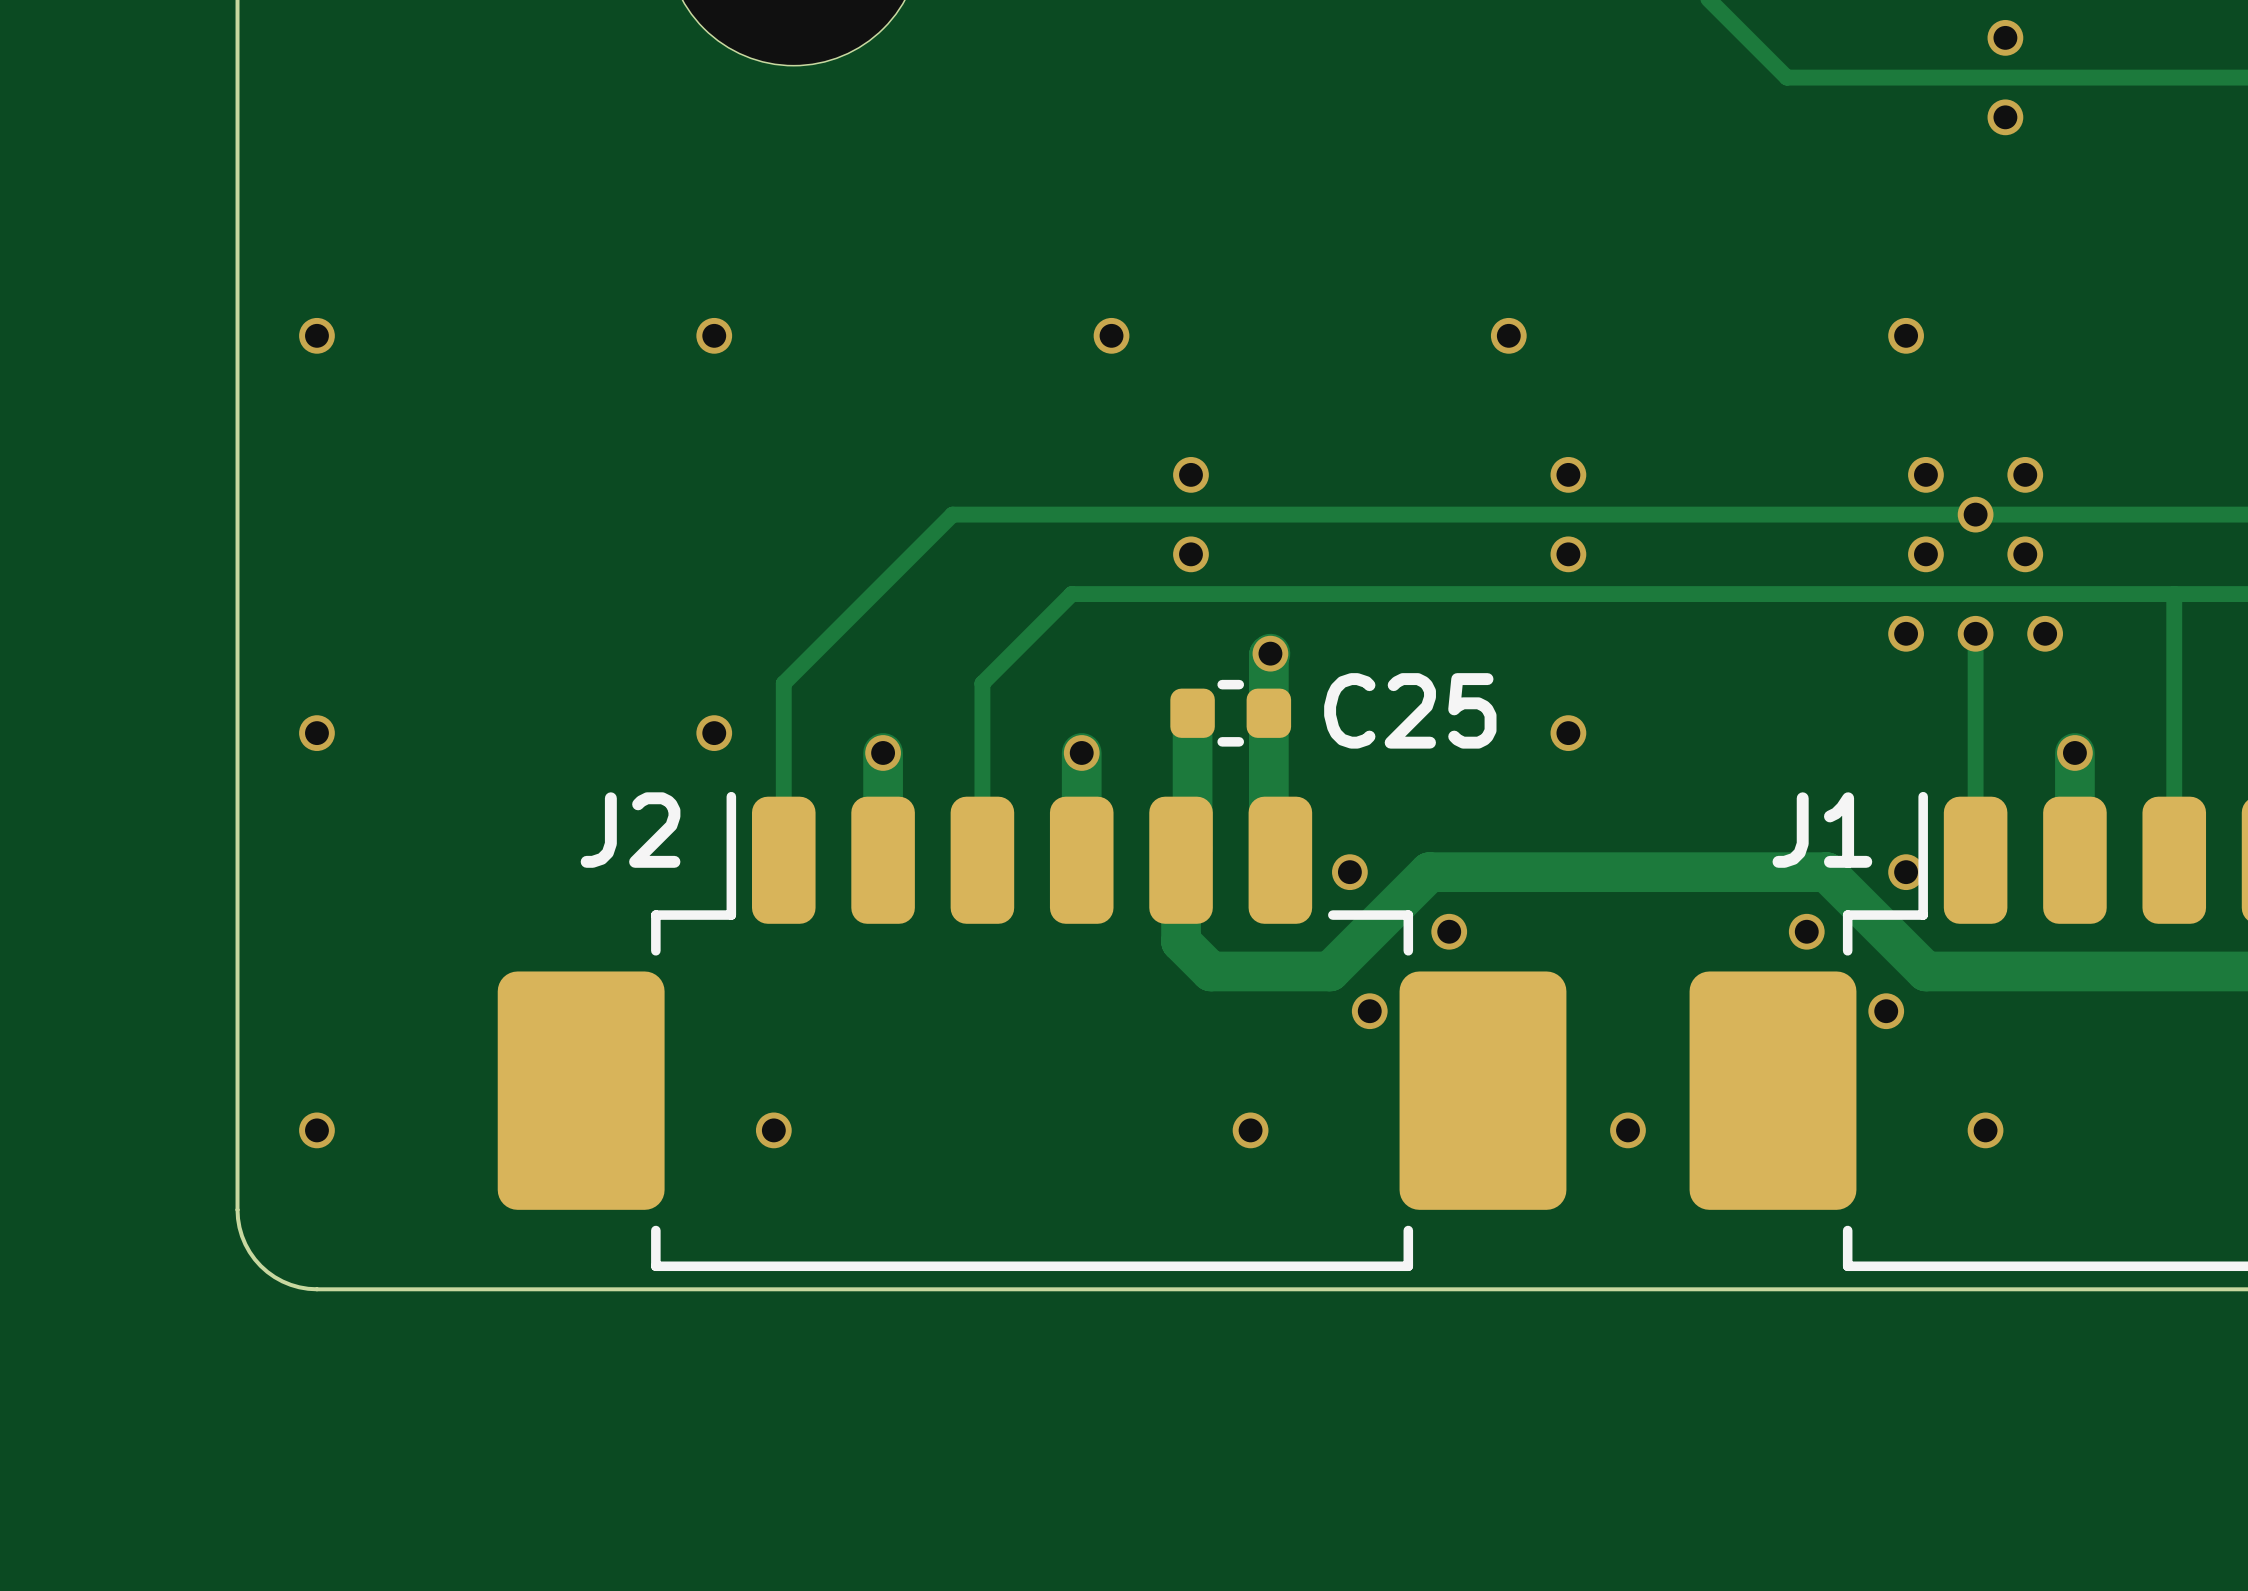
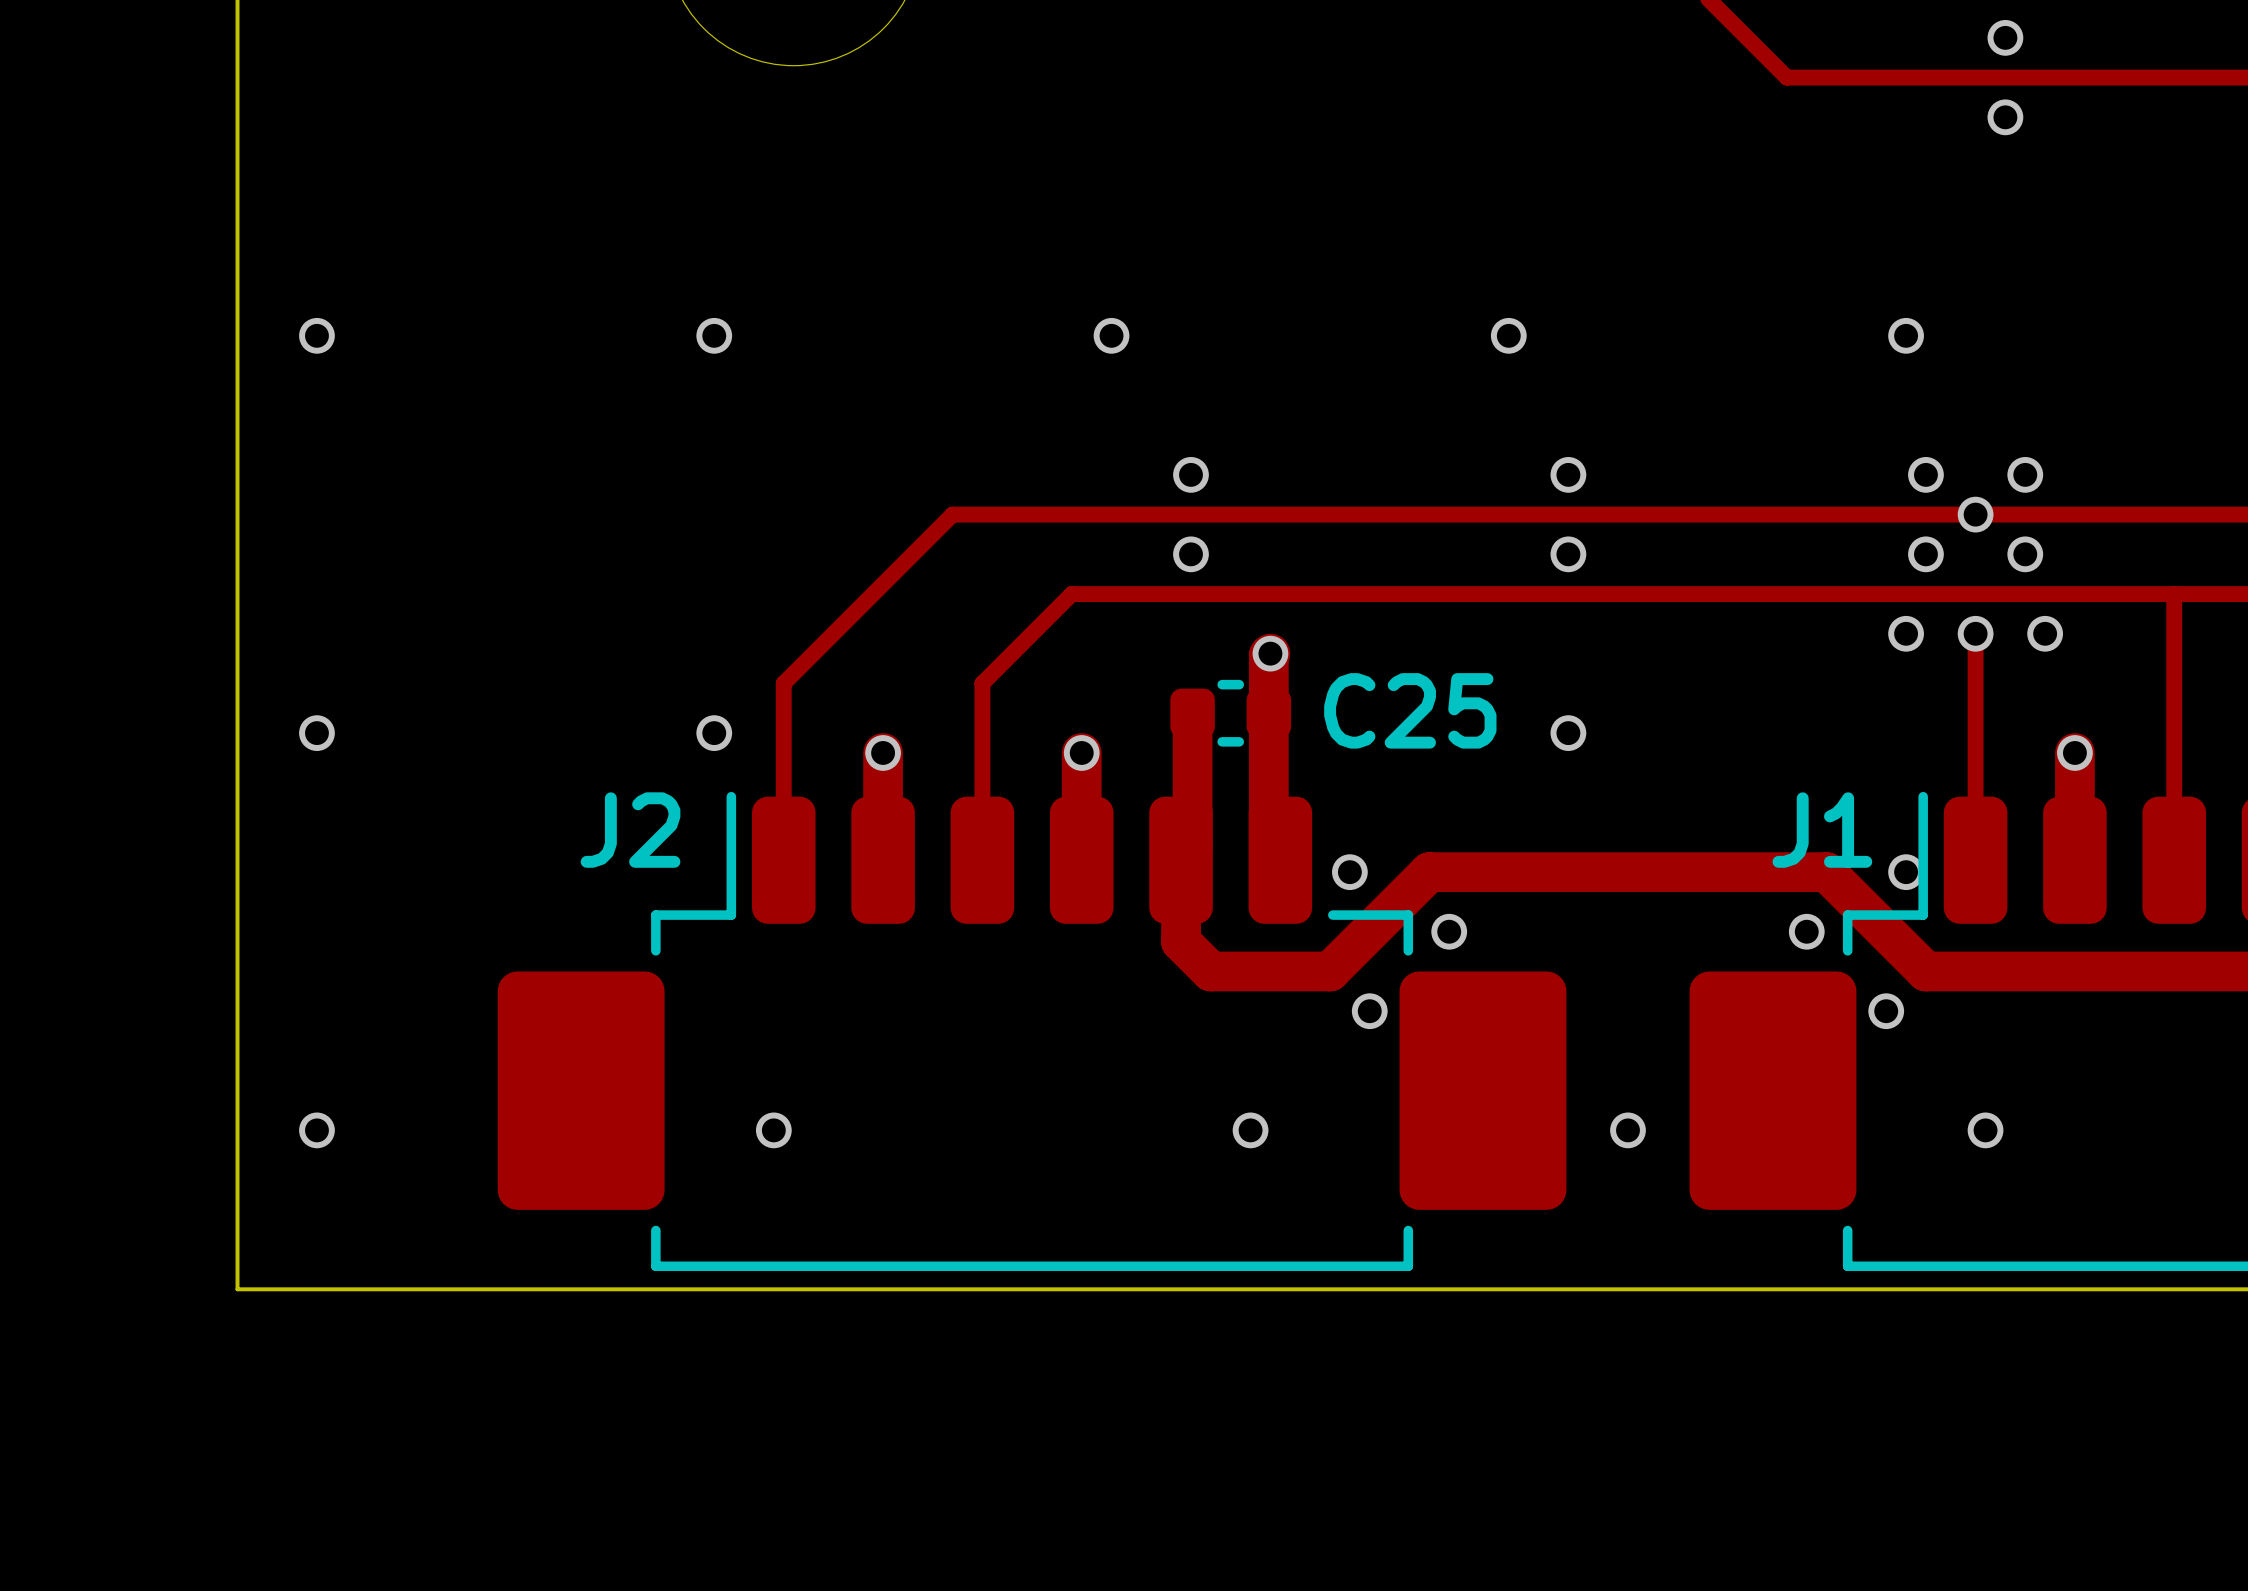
board edge: (237, 1209) (241, 1236) (249, 1252) (260, 1266) (274, 1277) (290, 1284) (316, 1289) -> (237, 1209) (237, 1289) (316, 1289)

